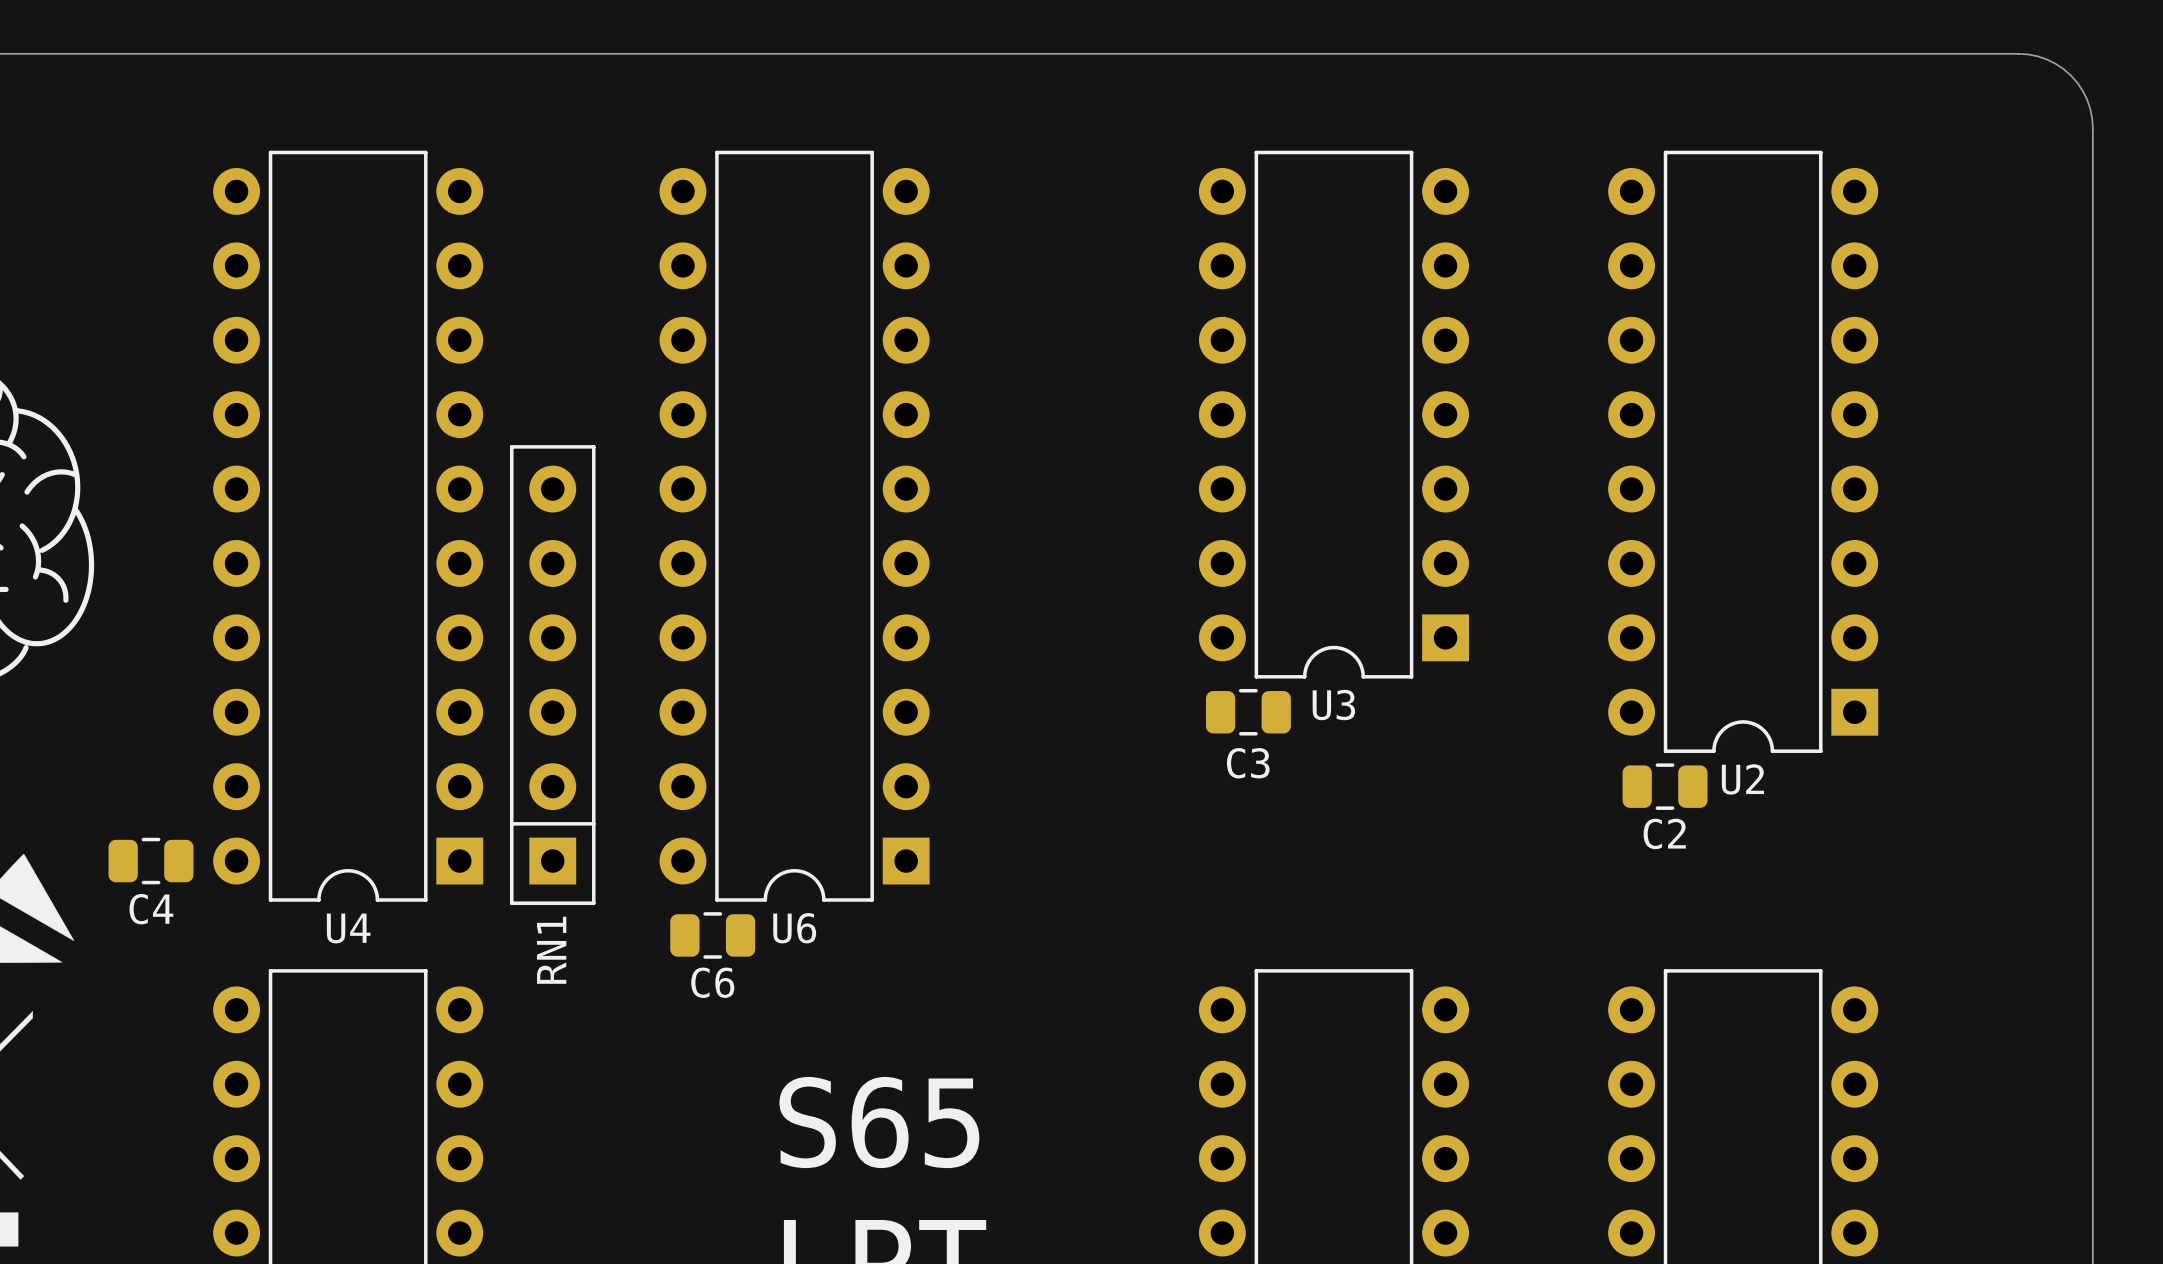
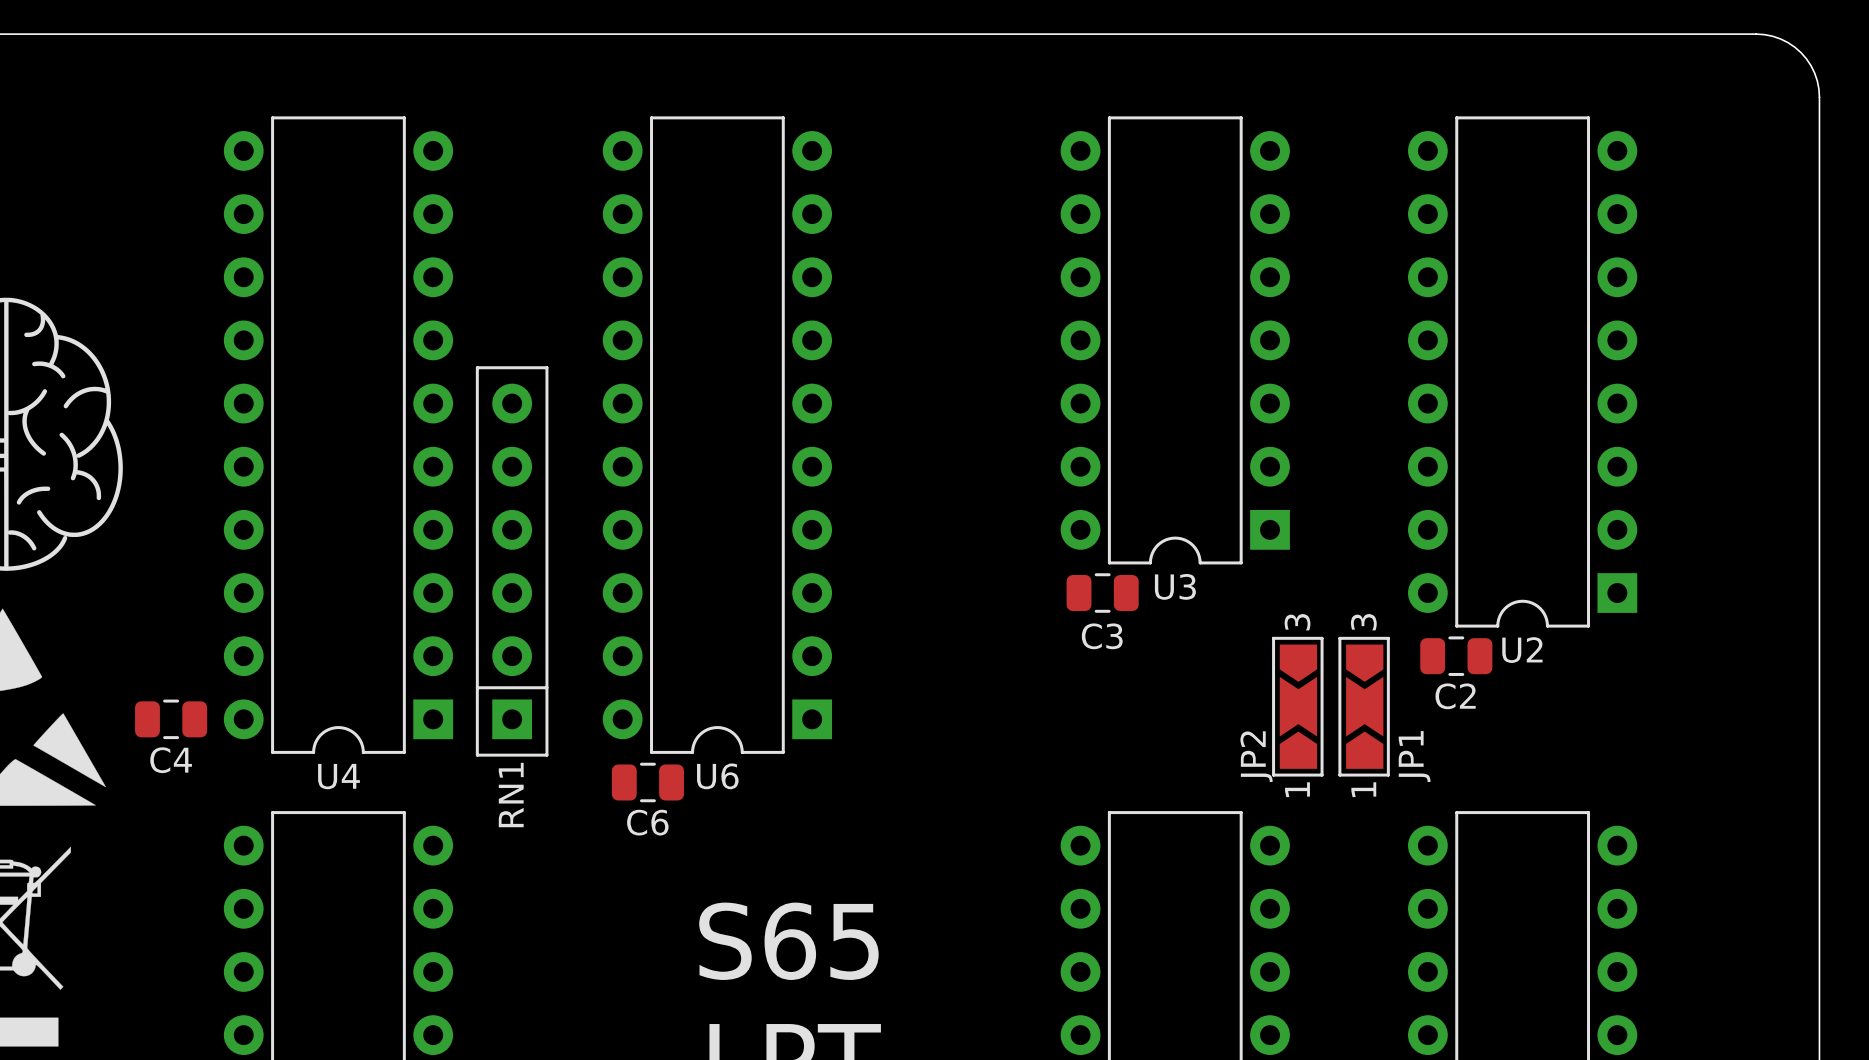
JP2: none -> (1297, 706)
JP1: none -> (1364, 706)

